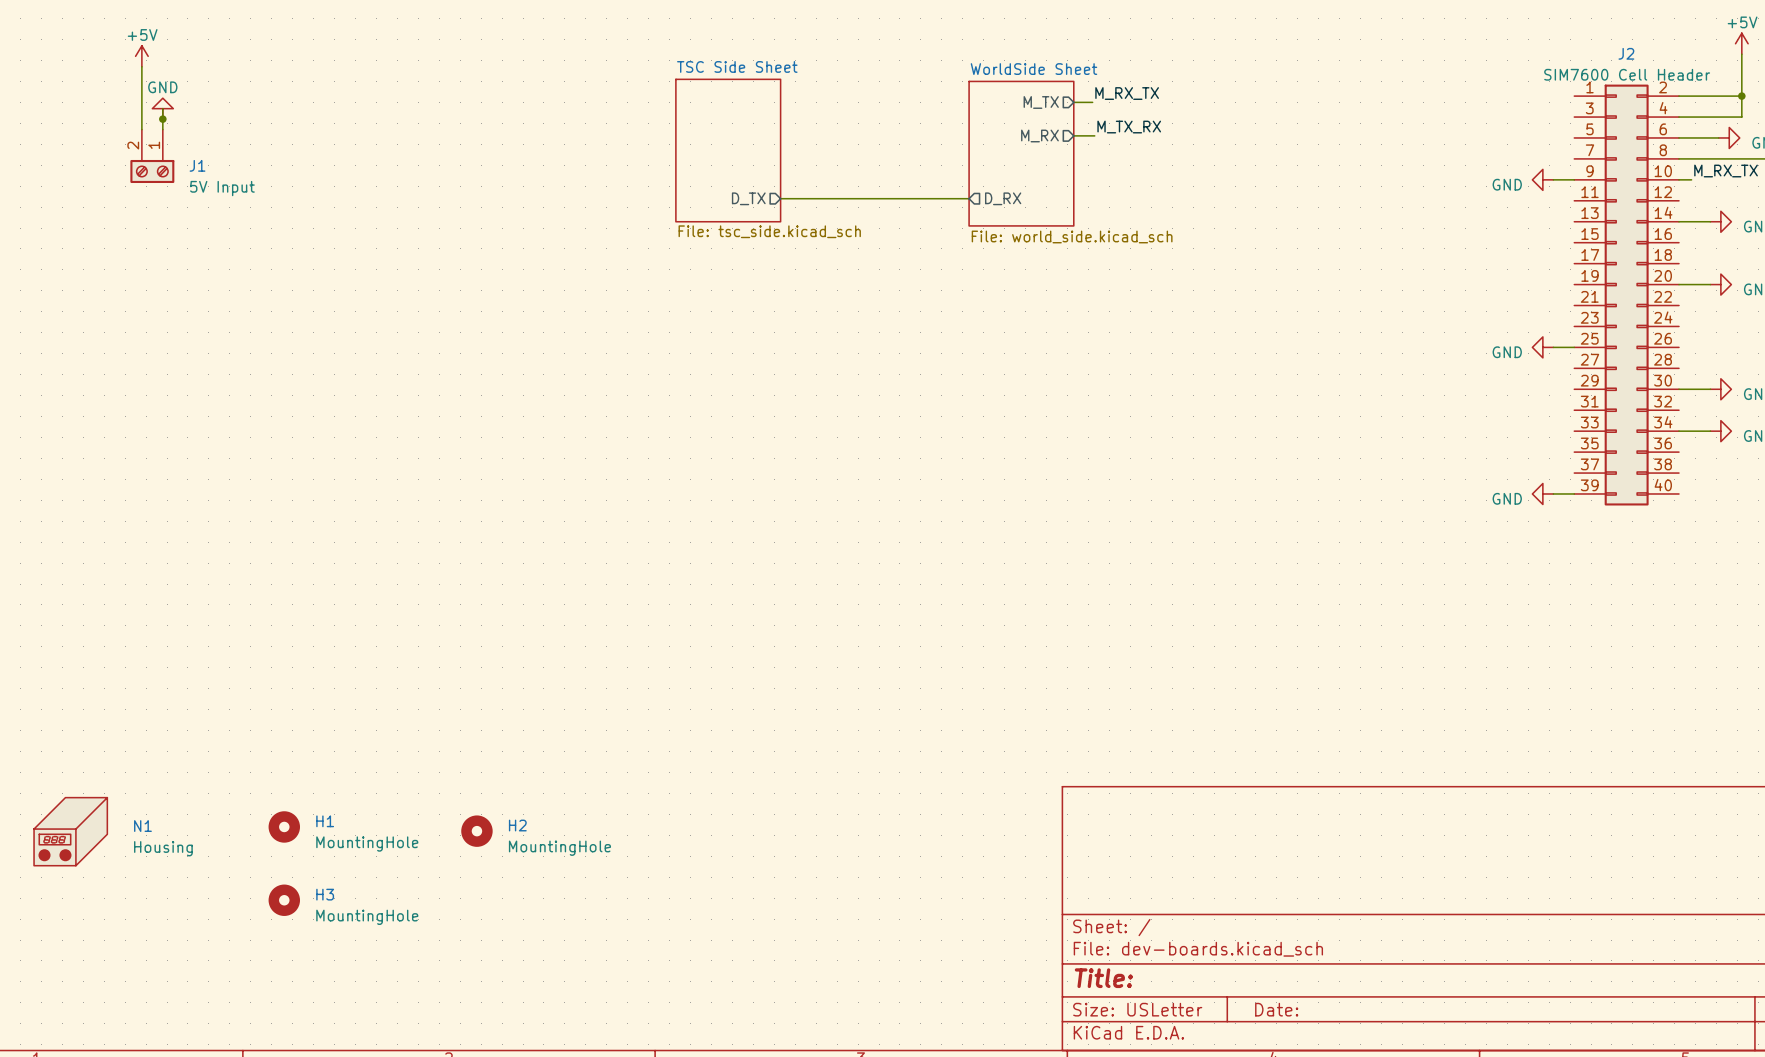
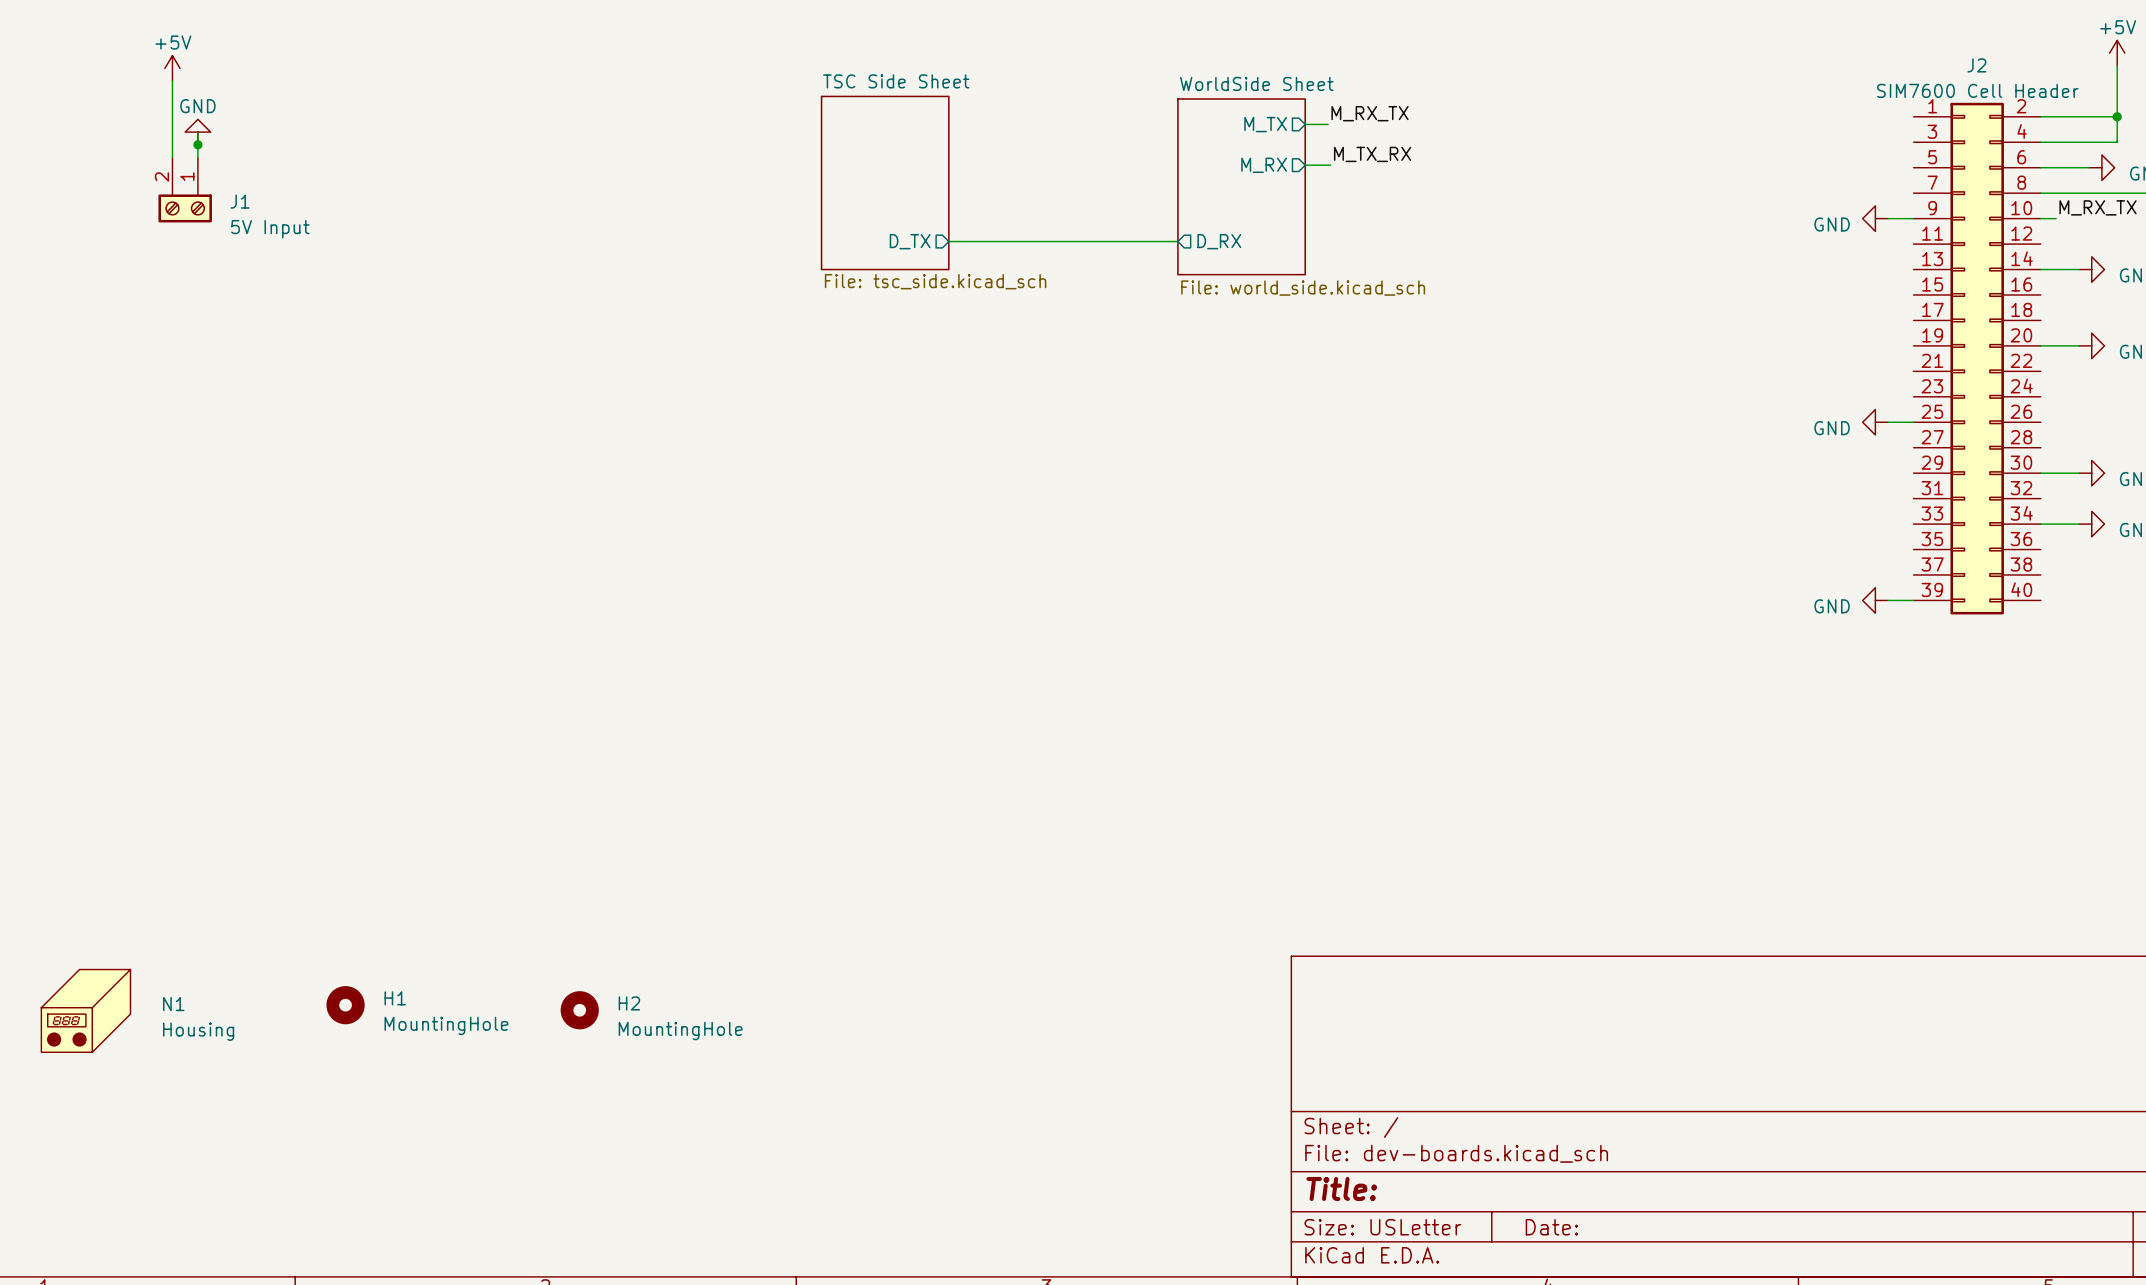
H3: MountingHole (284, 900) -> none

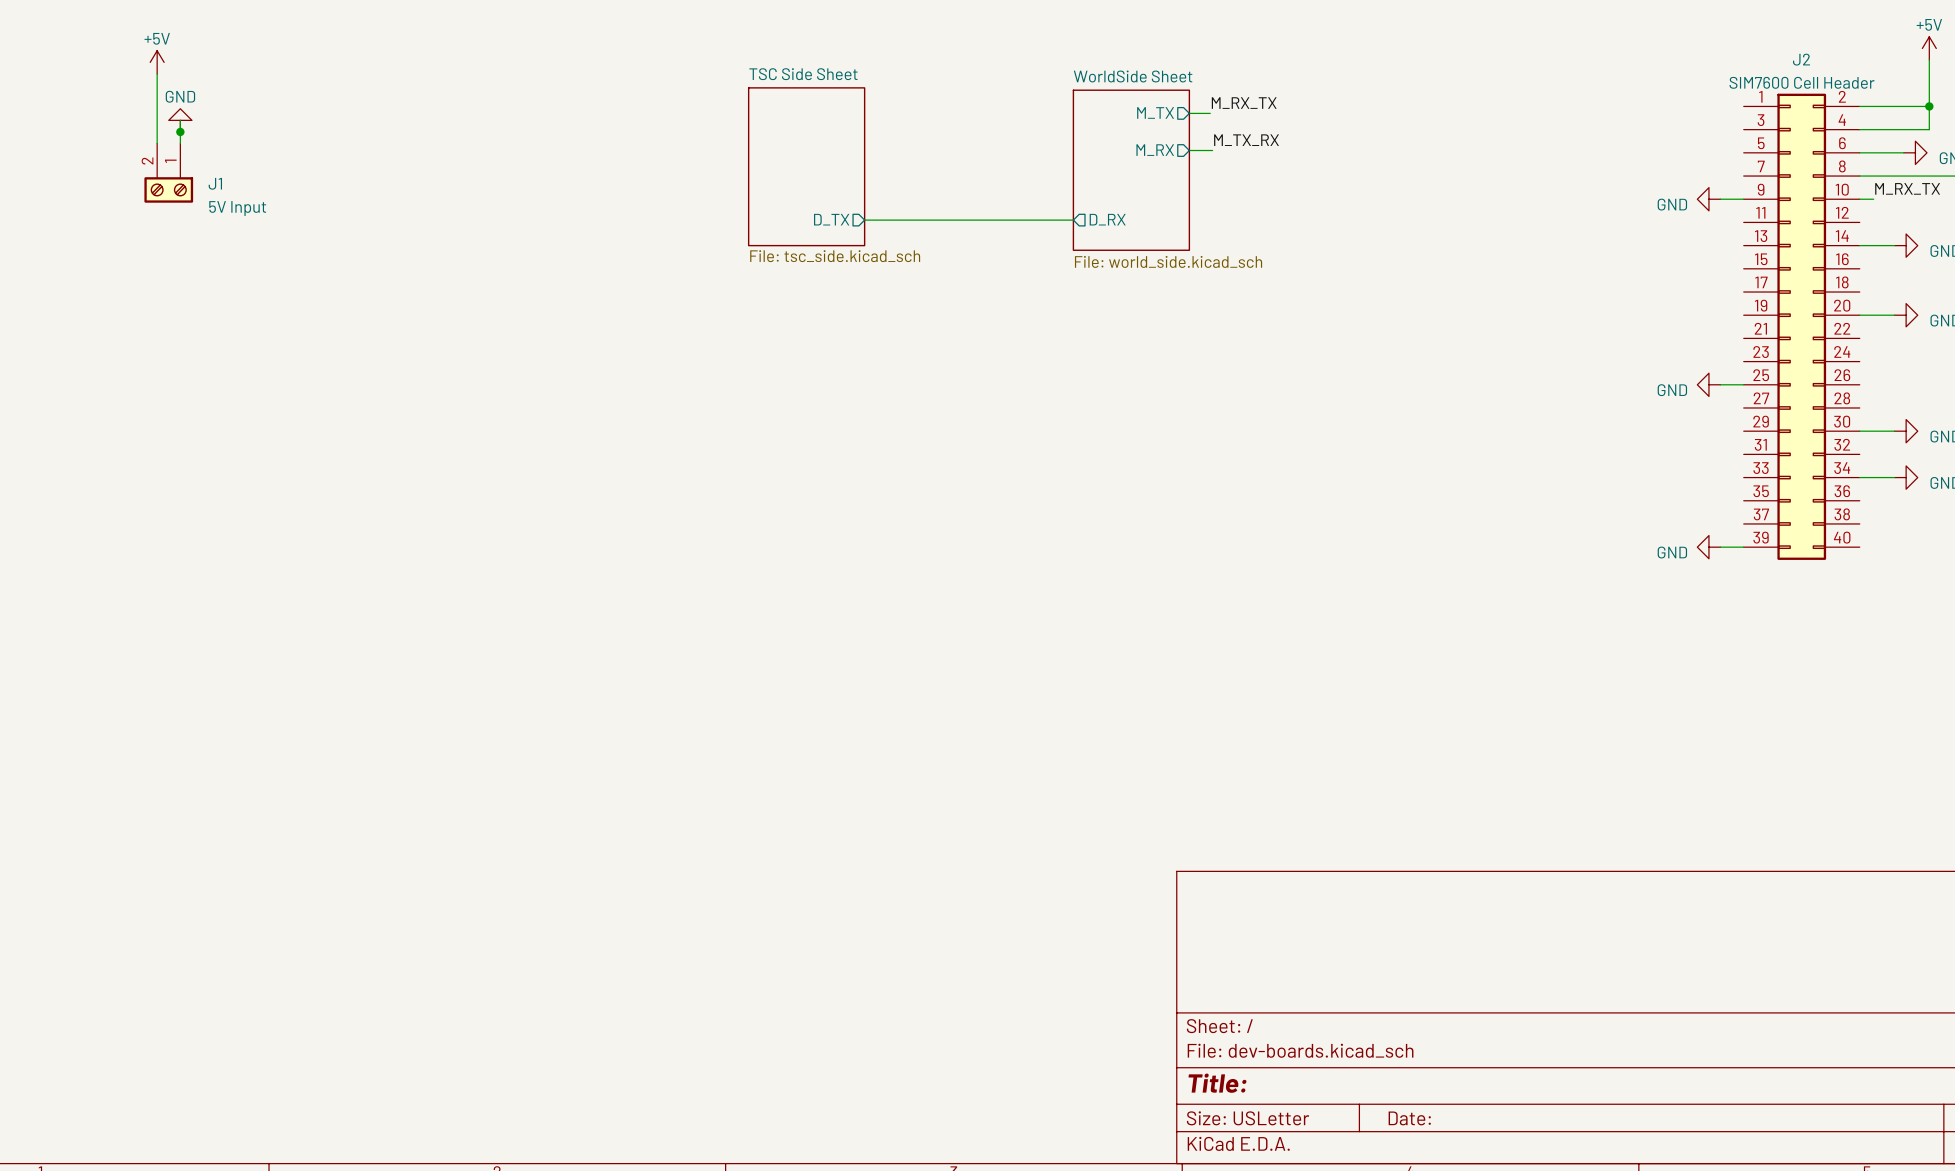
H1: MountingHole (345, 1005) -> none
N1: Housing (85, 1010) -> none
H2: MountingHole (579, 1010) -> none

